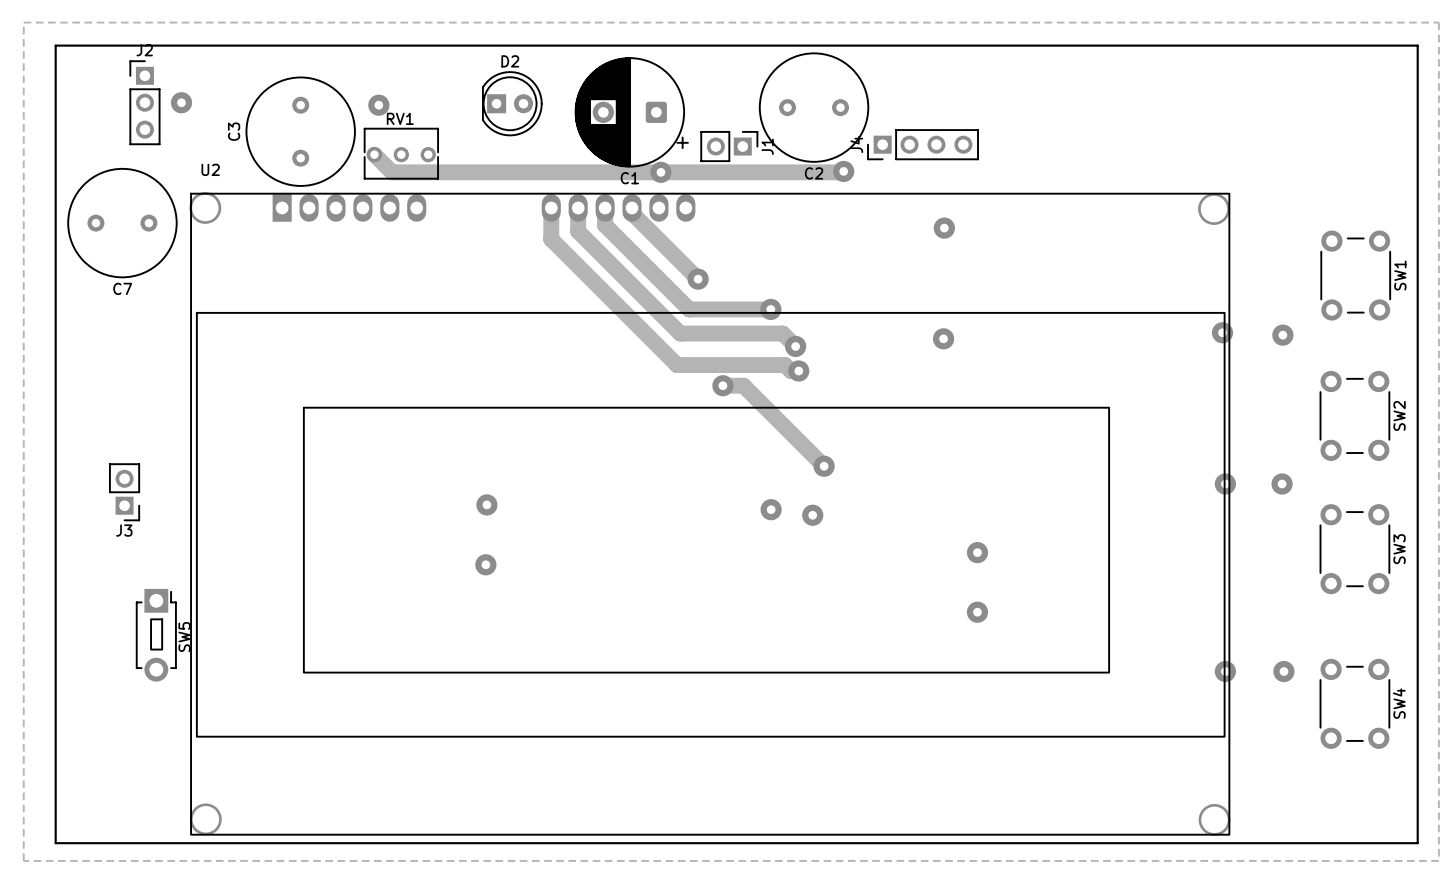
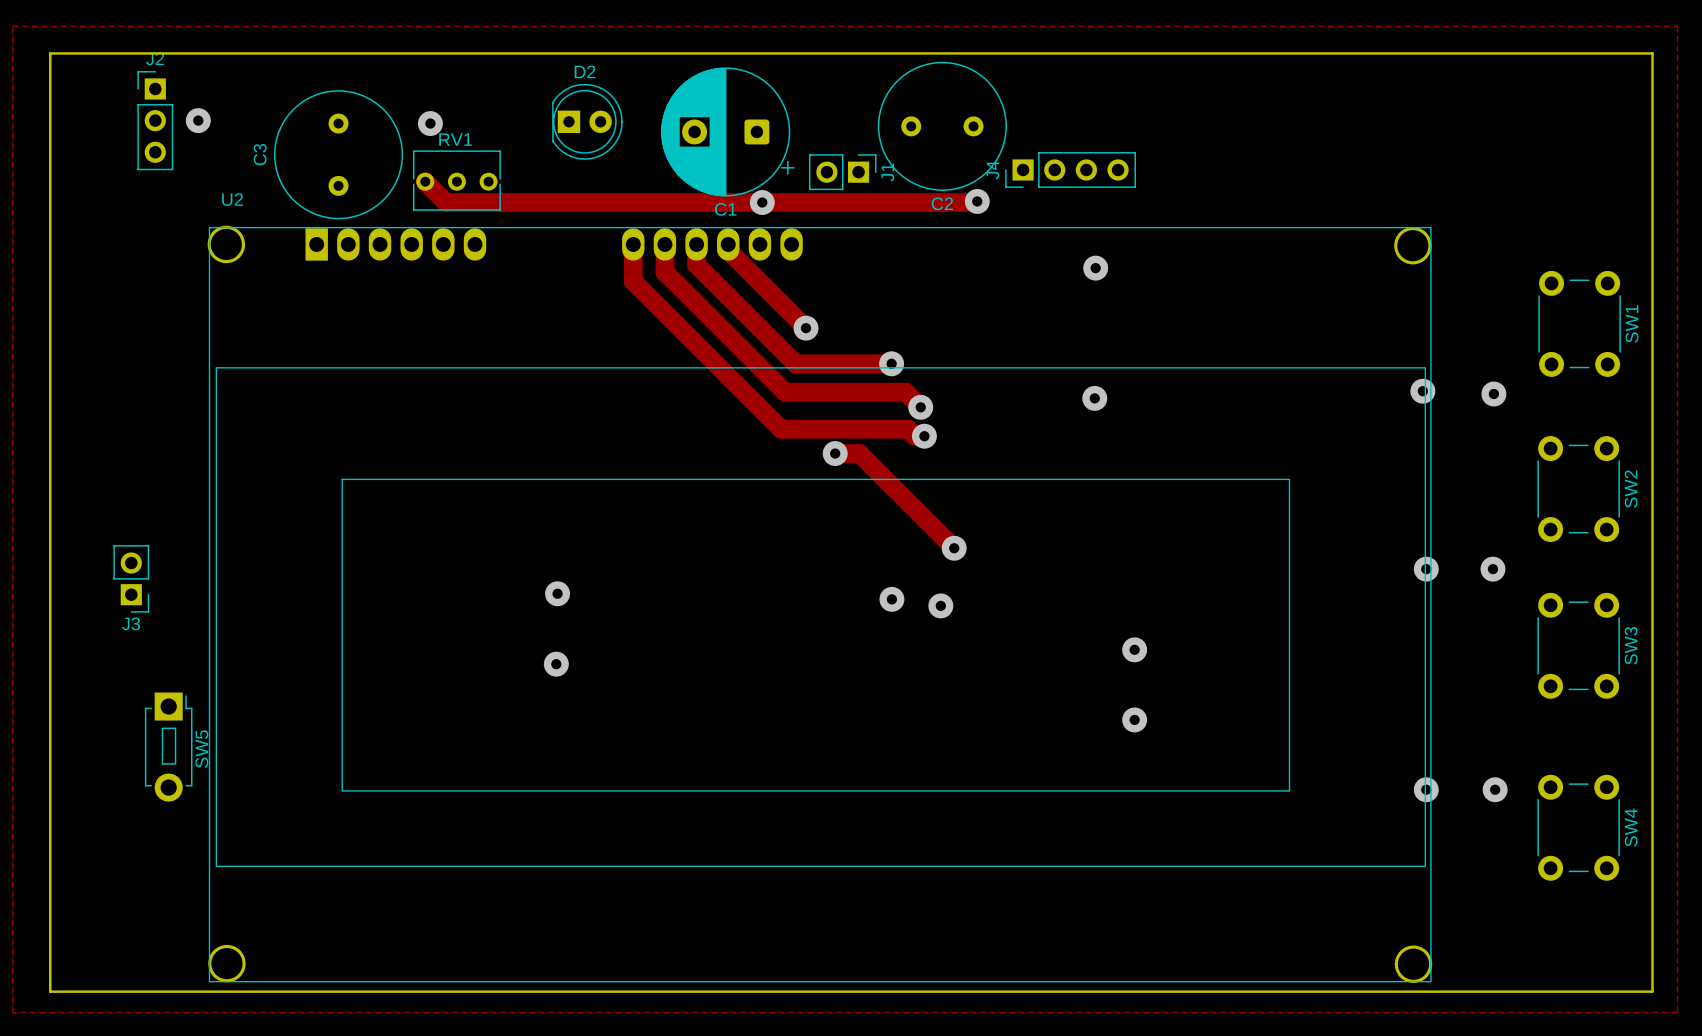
C7: (122, 223) -> none

